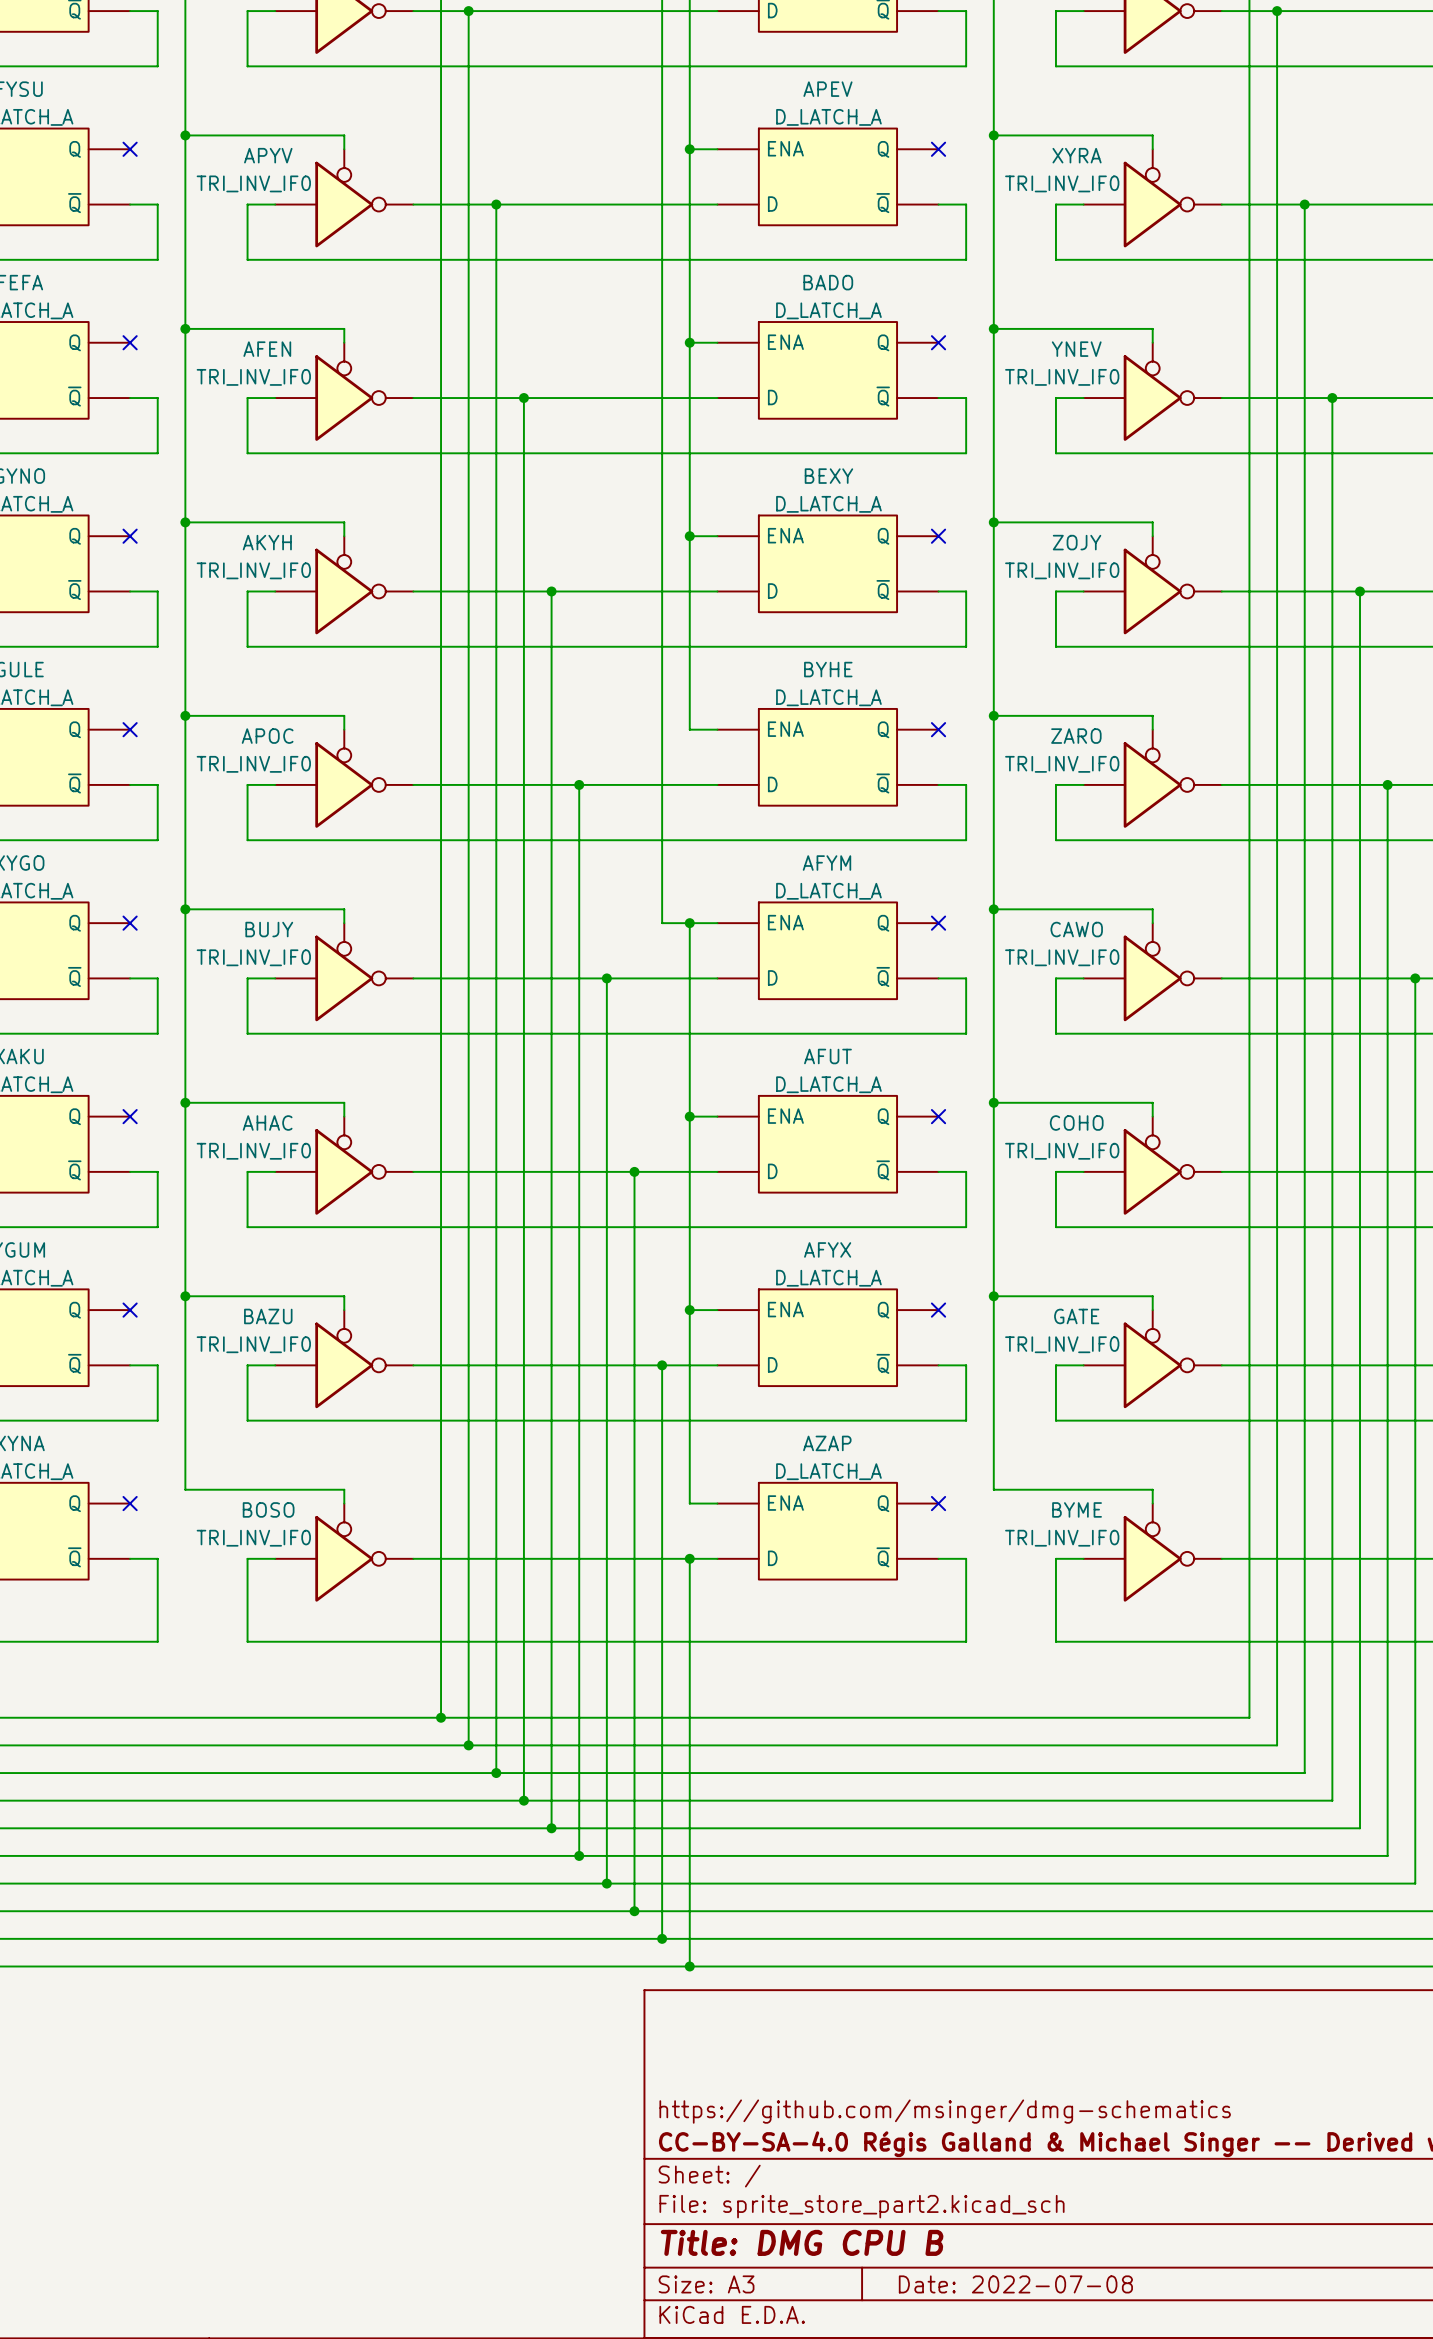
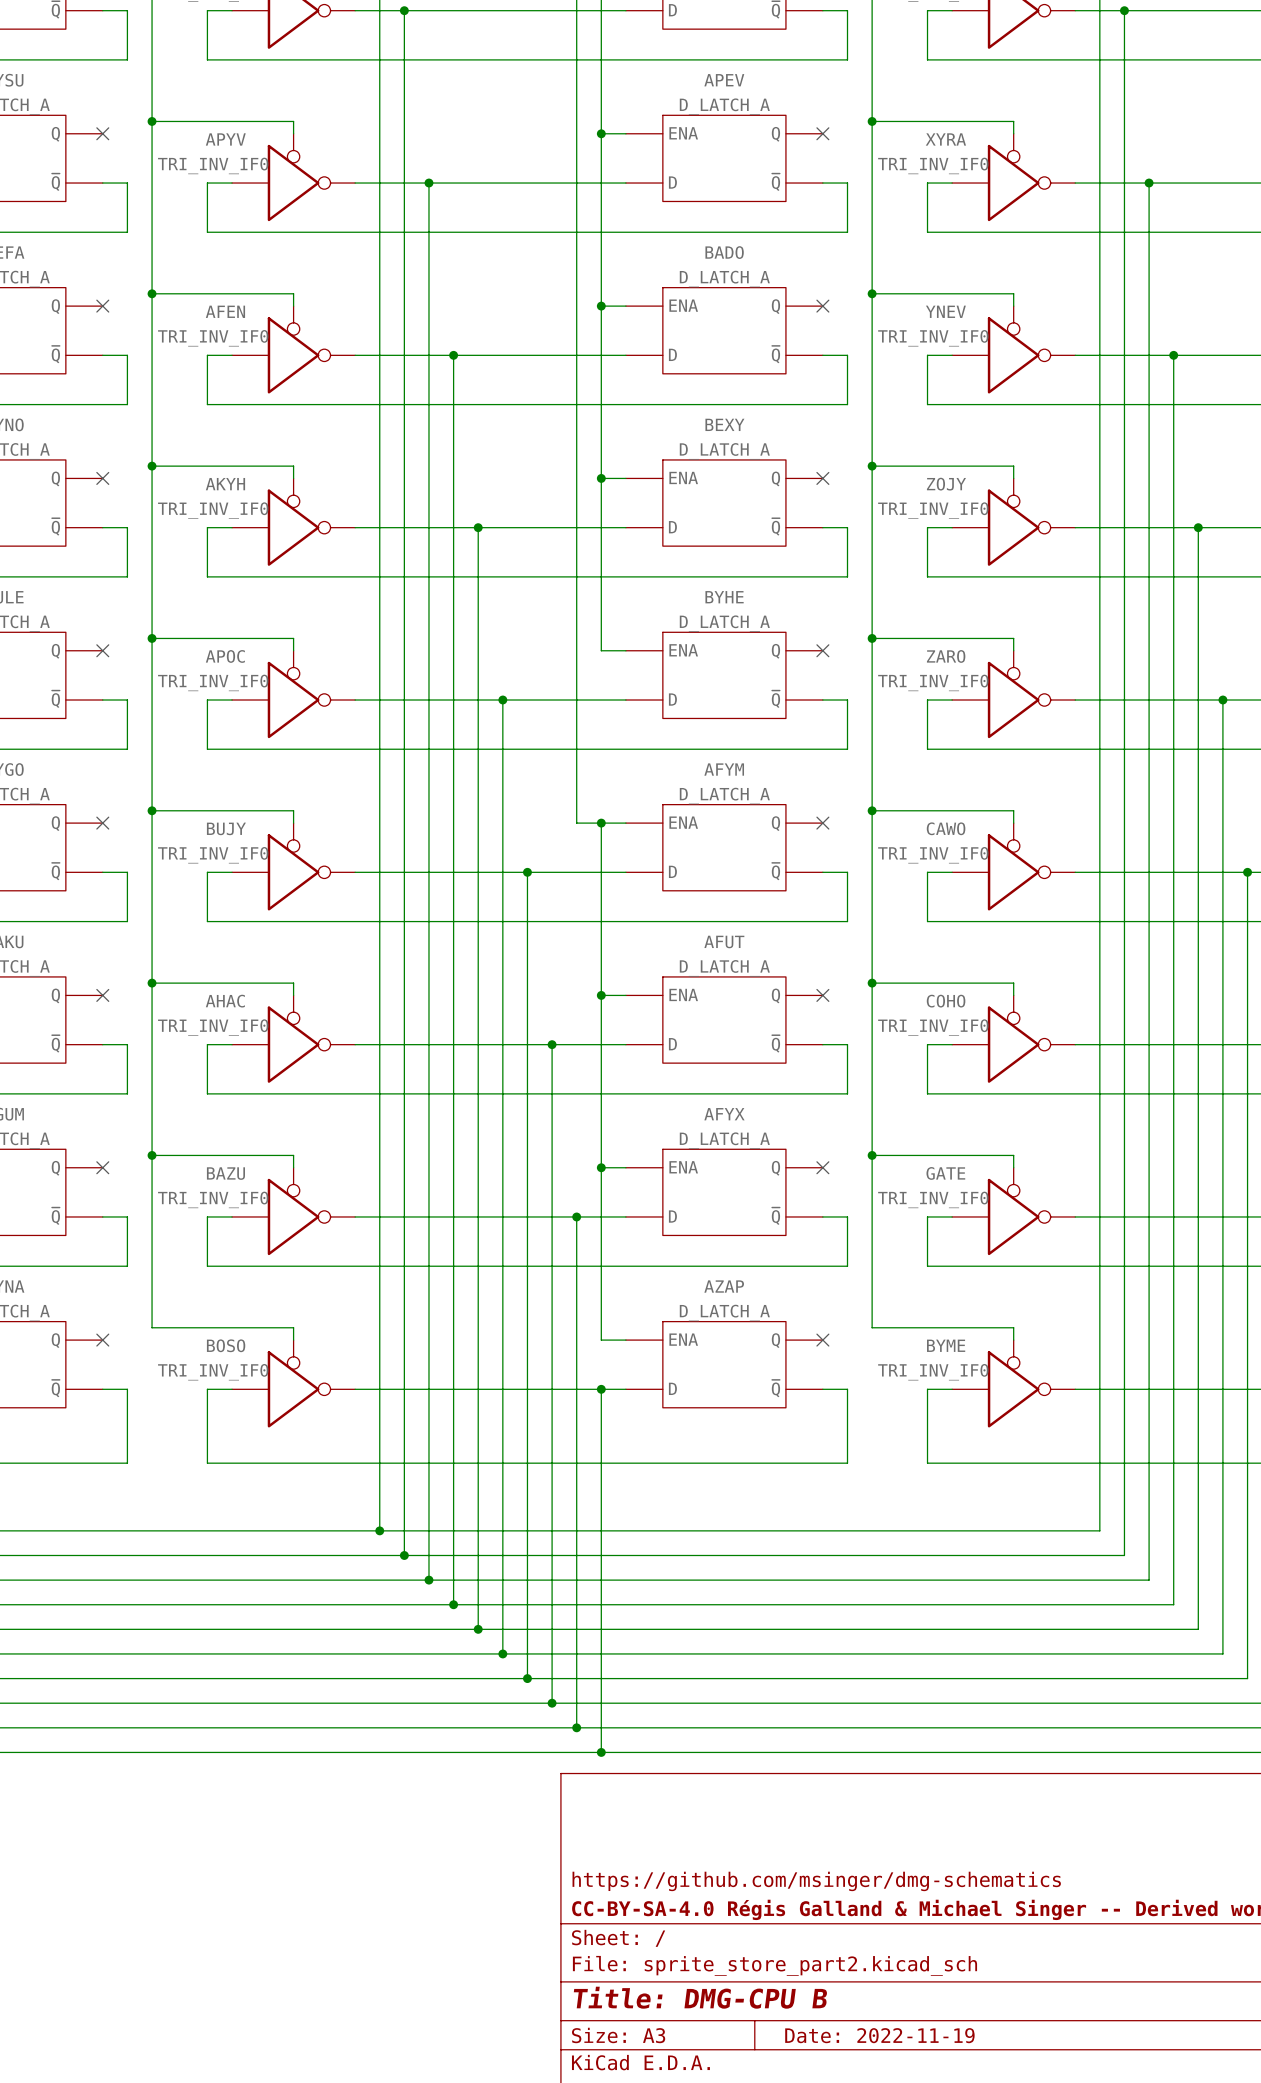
title block: Title: DMG CPU B (802, 2242) -> Title: DMG-CPU B (700, 1997)
title block: Date: 2022-07-08 (1015, 2284) -> Date: 2022-11-19 (879, 2035)

